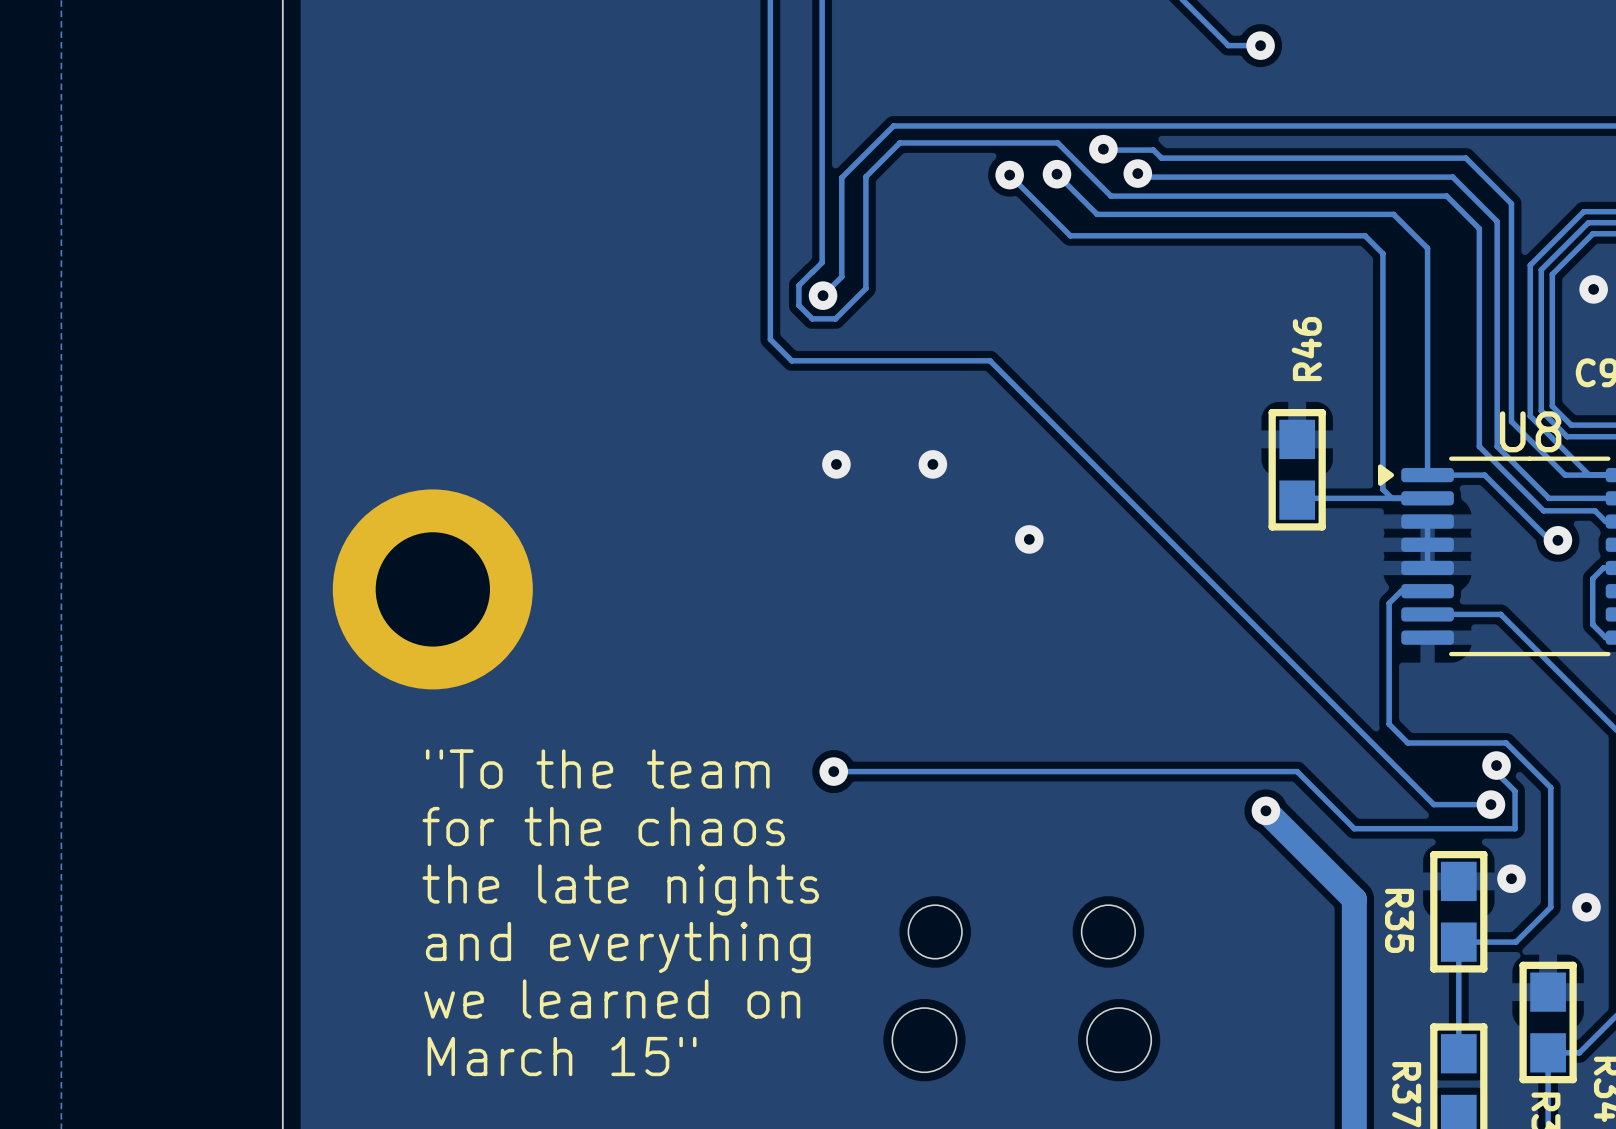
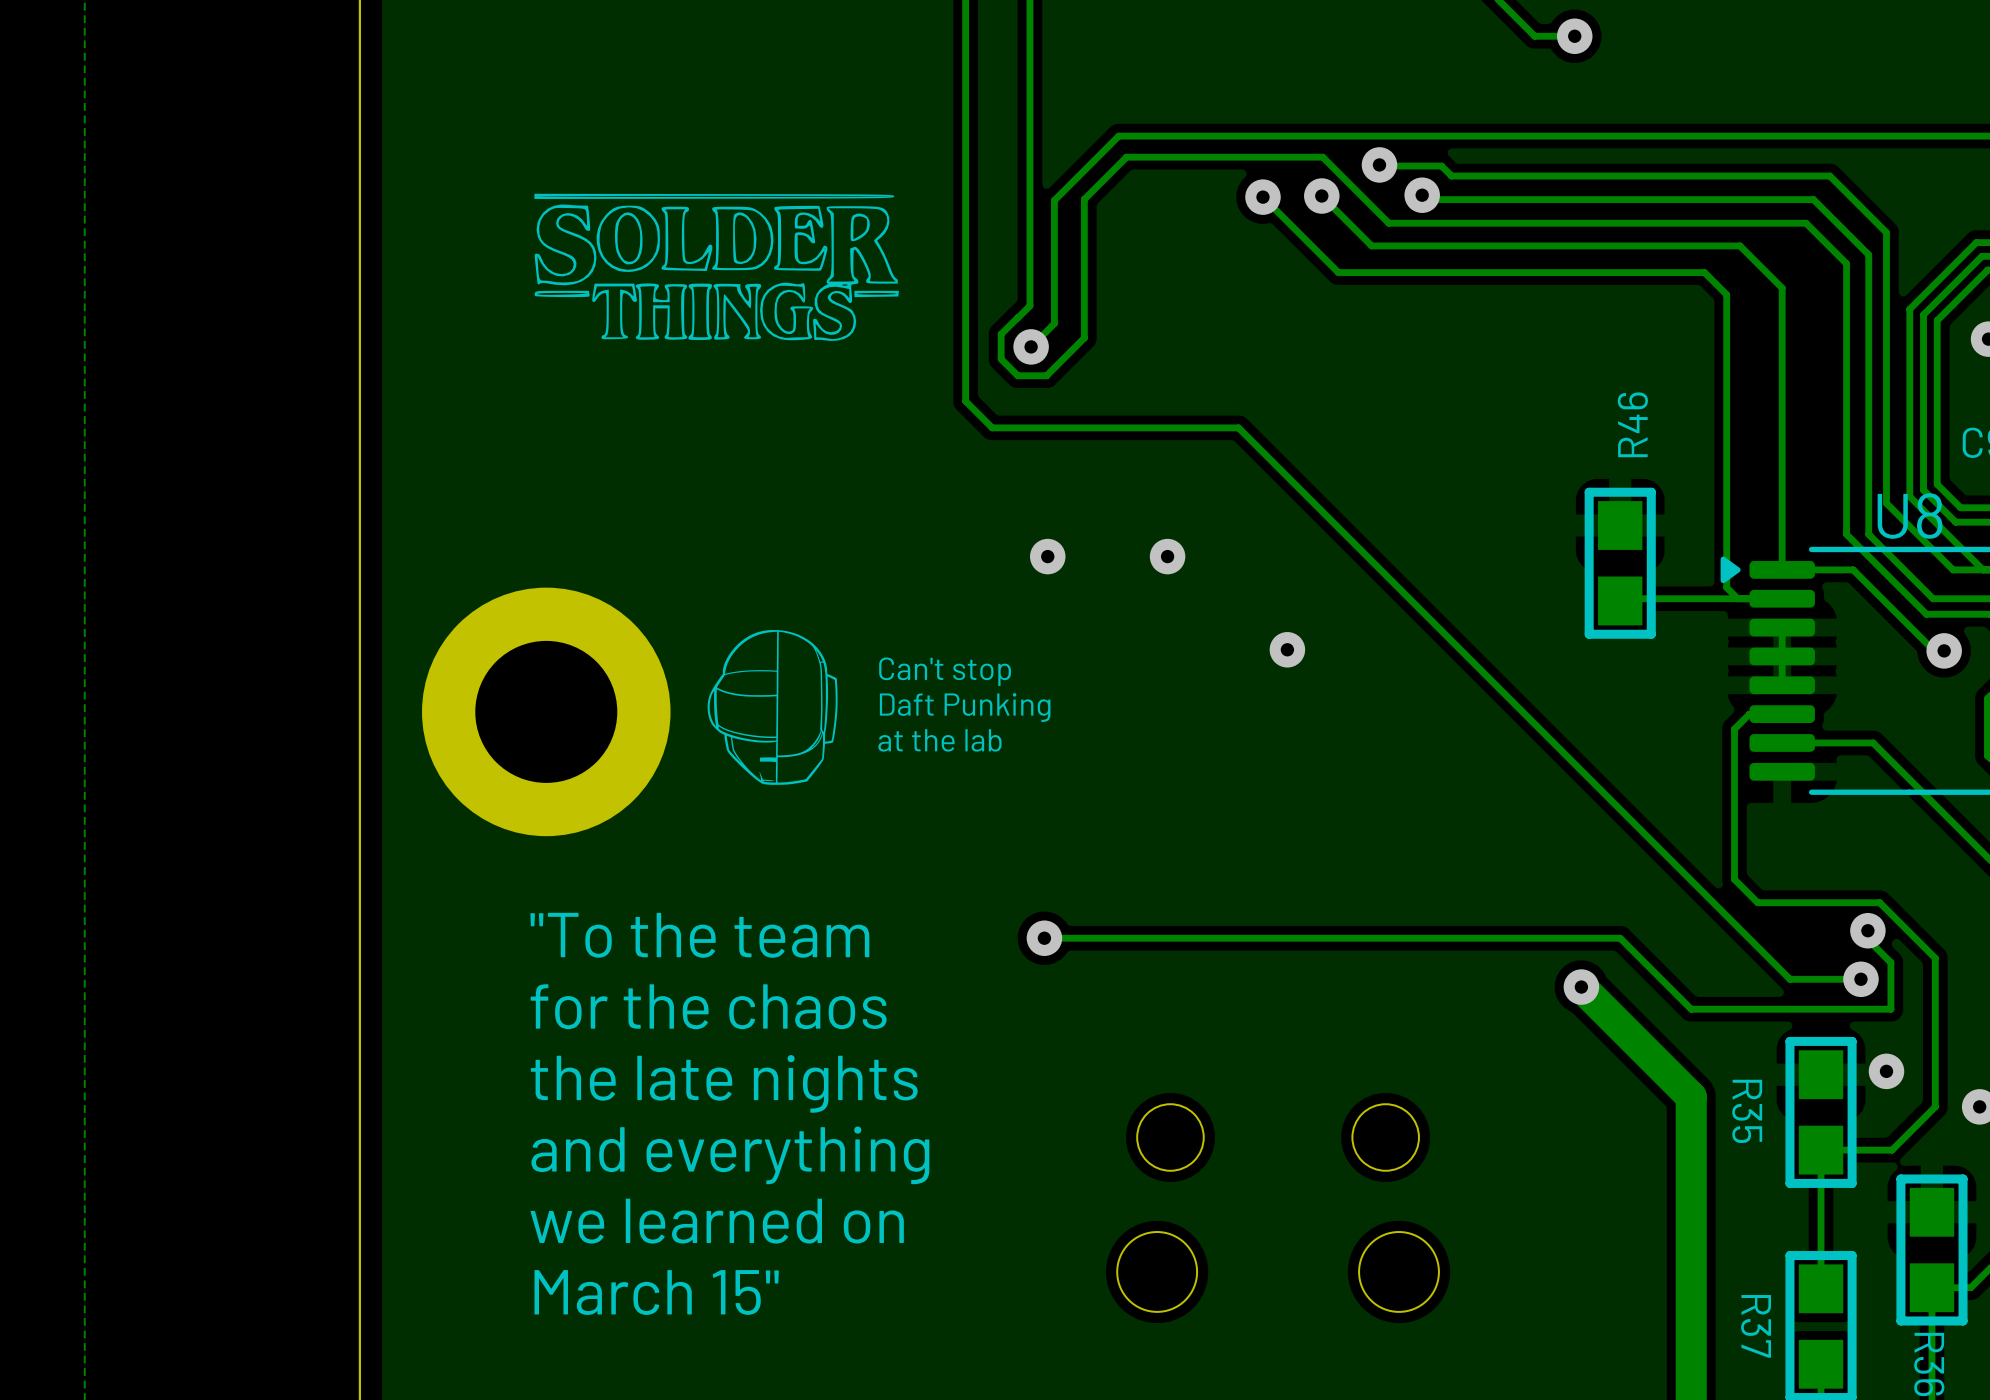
drawing: none -> [534, 193, 899, 341]
drawing: none -> [707, 630, 838, 785]
text: none -> Can't stop (945, 671)
text: none -> Daft Punking (965, 707)
text: none -> at the lab (939, 740)

